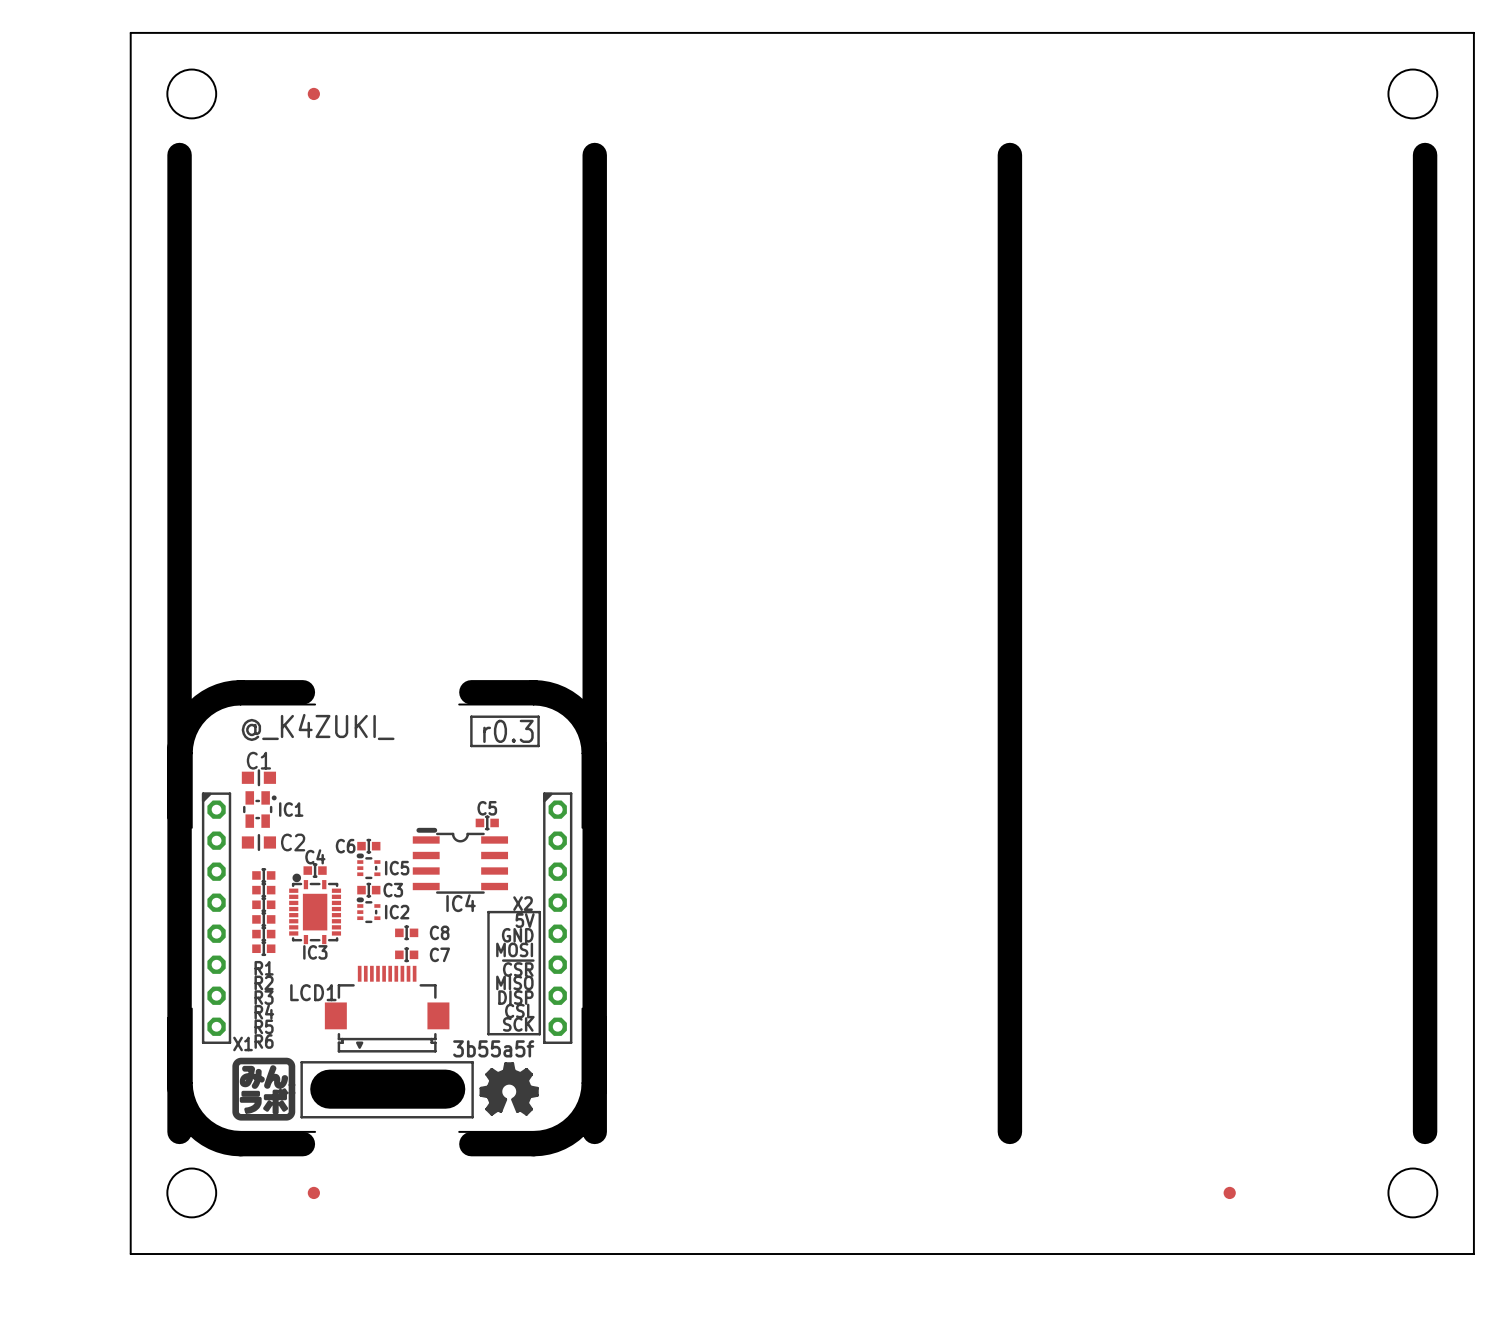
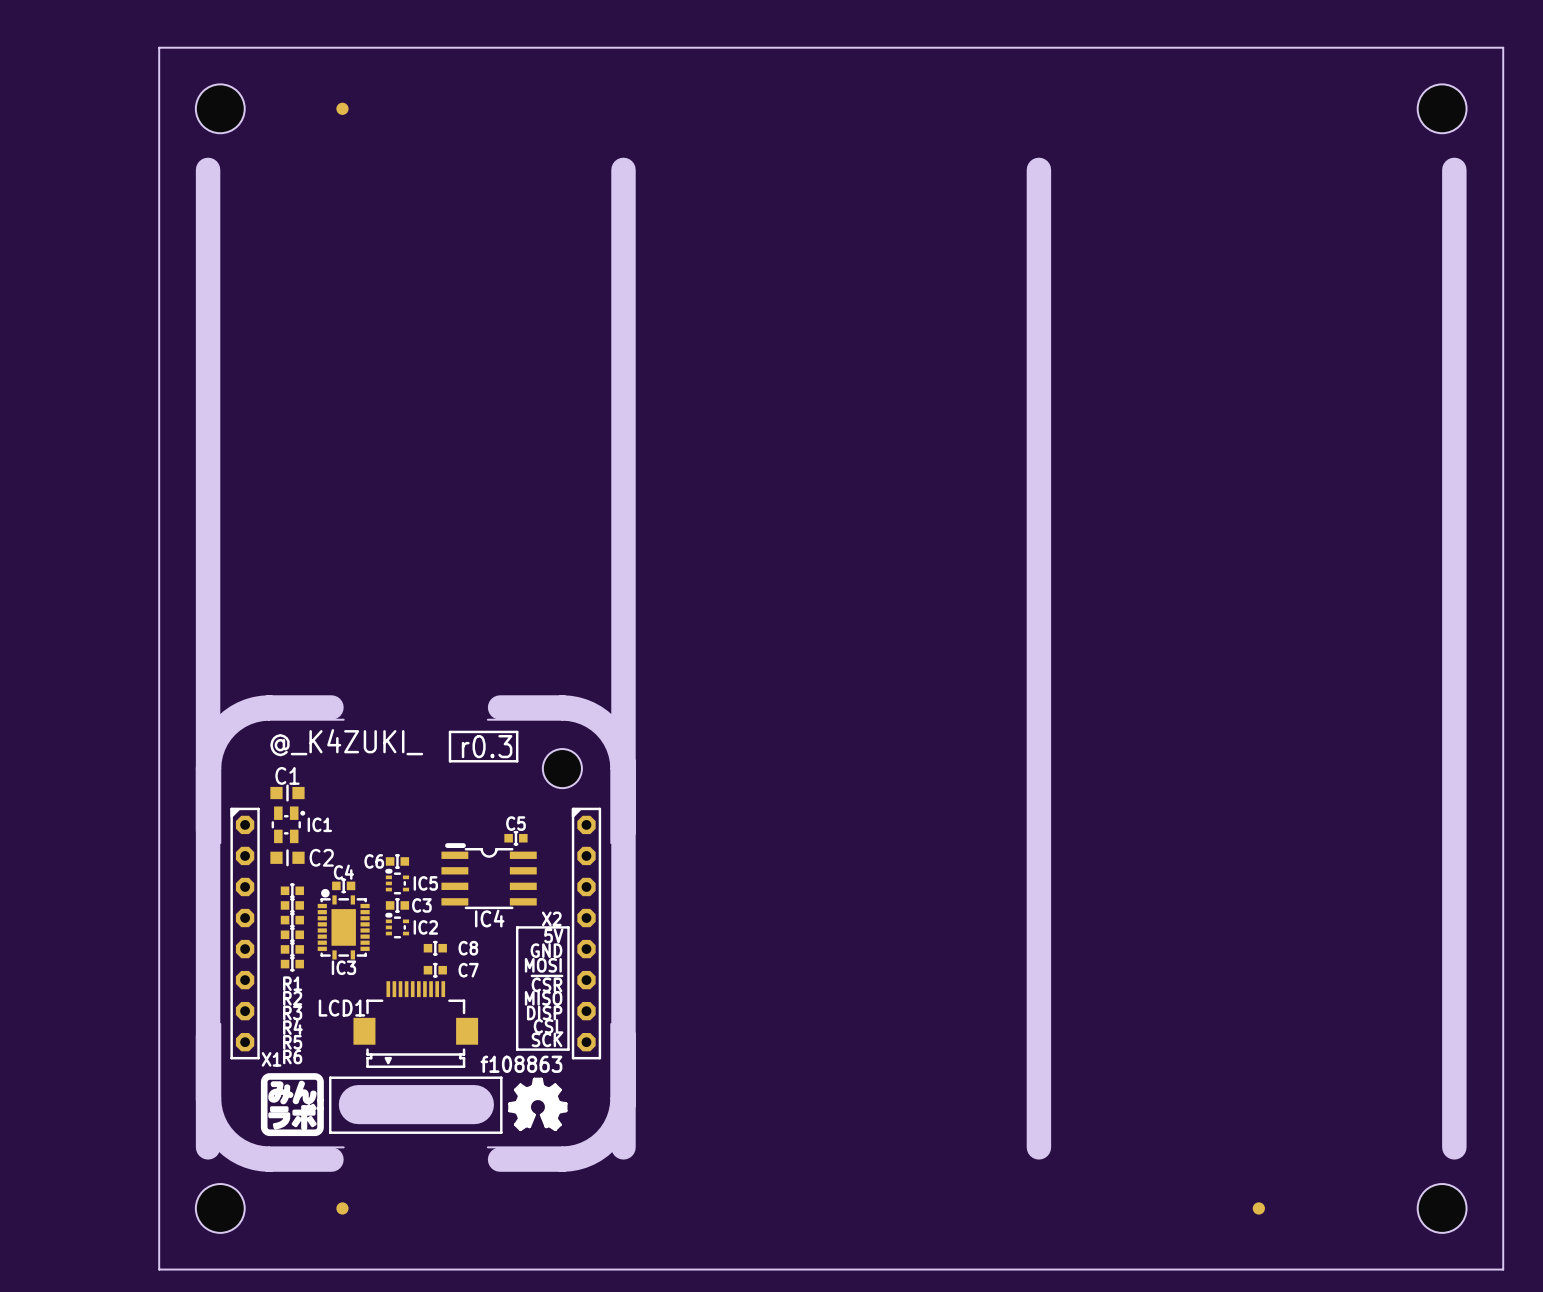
drawing position: (504, 731) -> (483, 746)
part: none -> (561, 769)
drawing shape: [453, 1040, 535, 1058] -> [480, 1055, 563, 1073]

